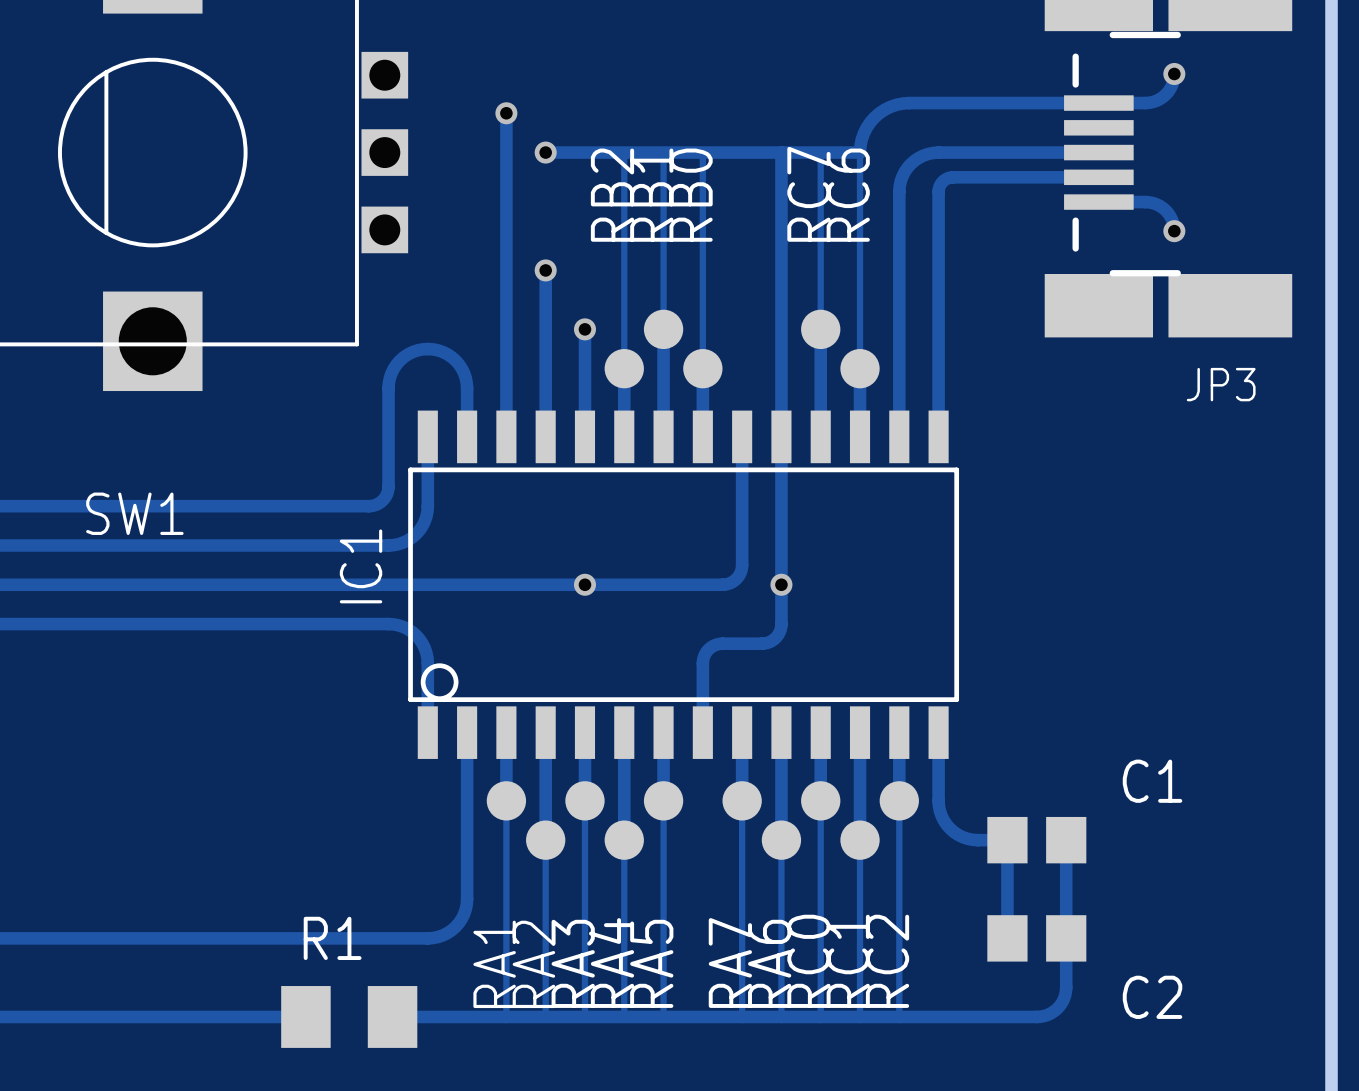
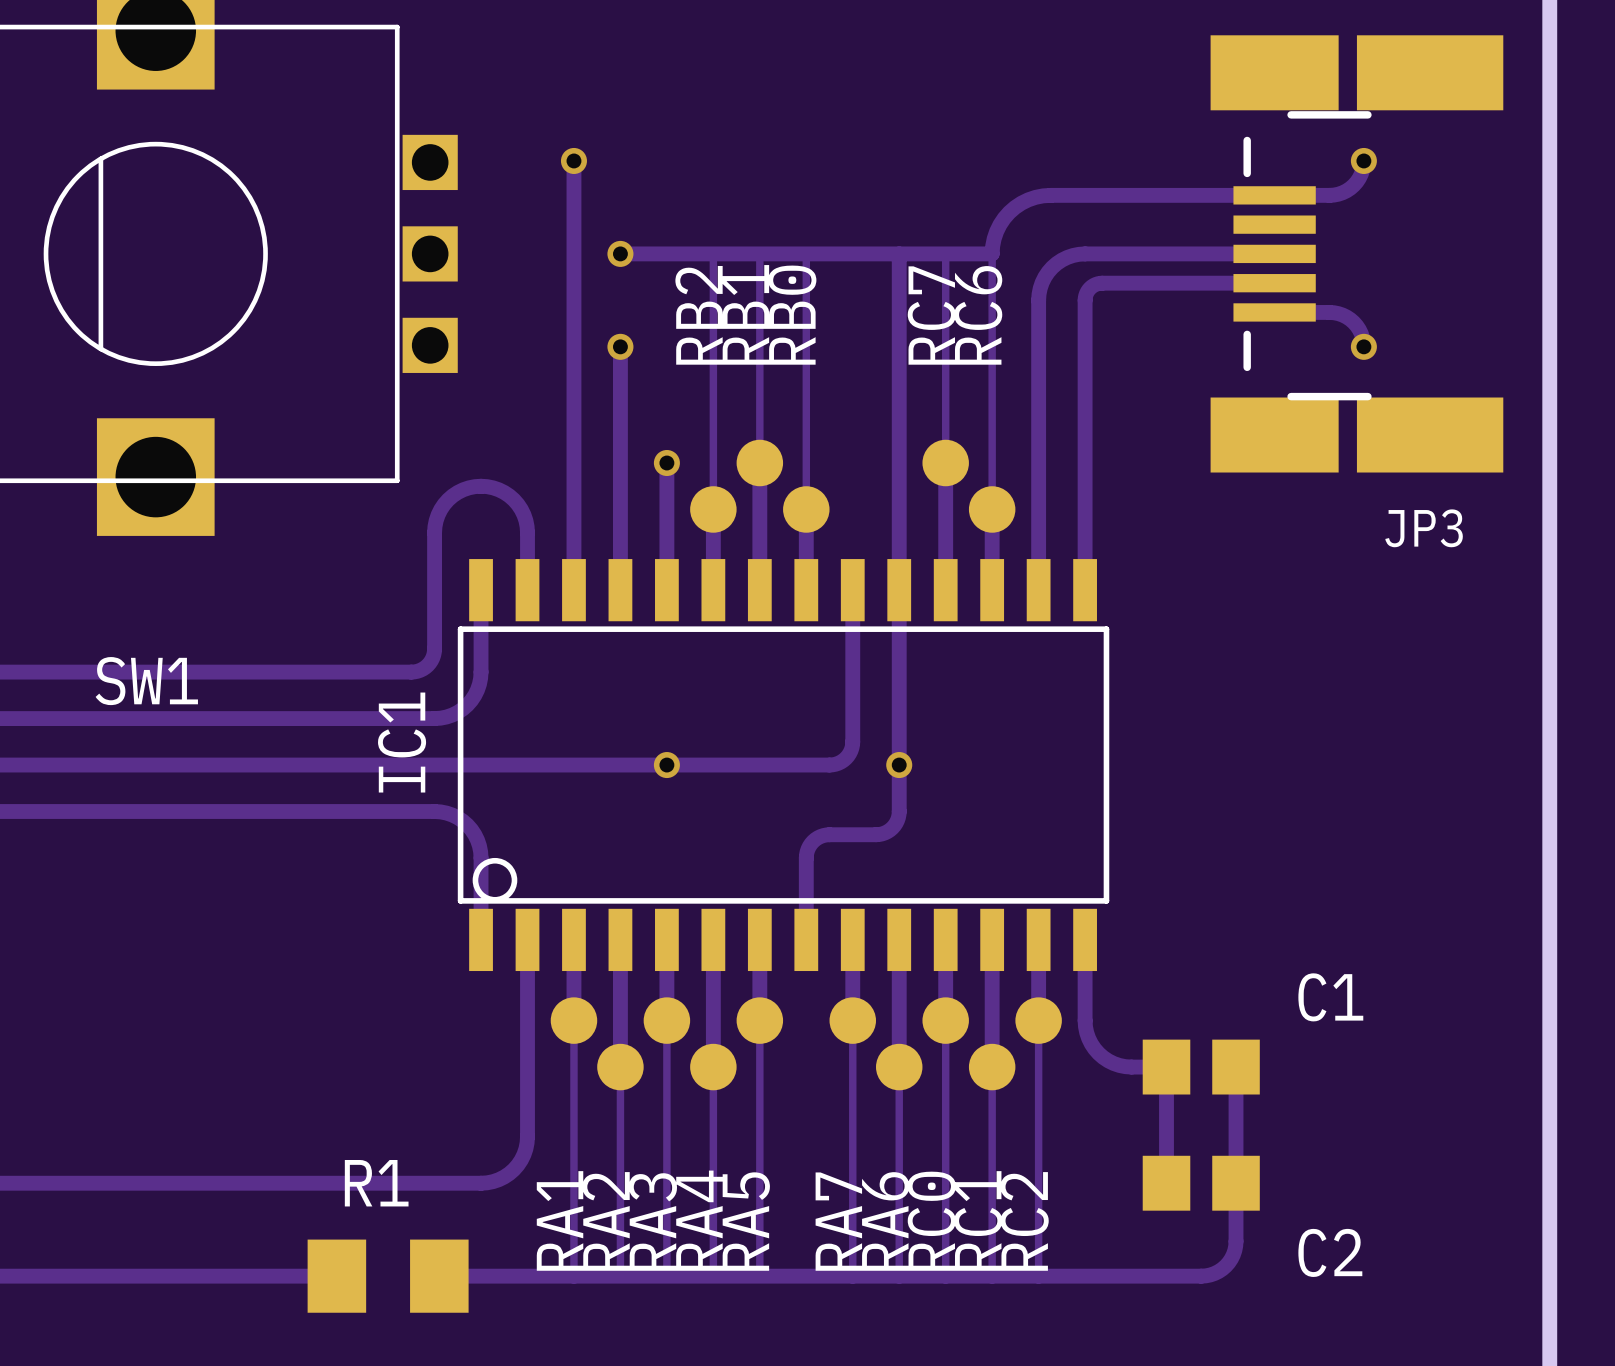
track: none -> (573, 160) (573, 207)
via position: (506, 113) -> (573, 160)
track: none -> (620, 346) (620, 393)
via position: (545, 270) -> (620, 346)

